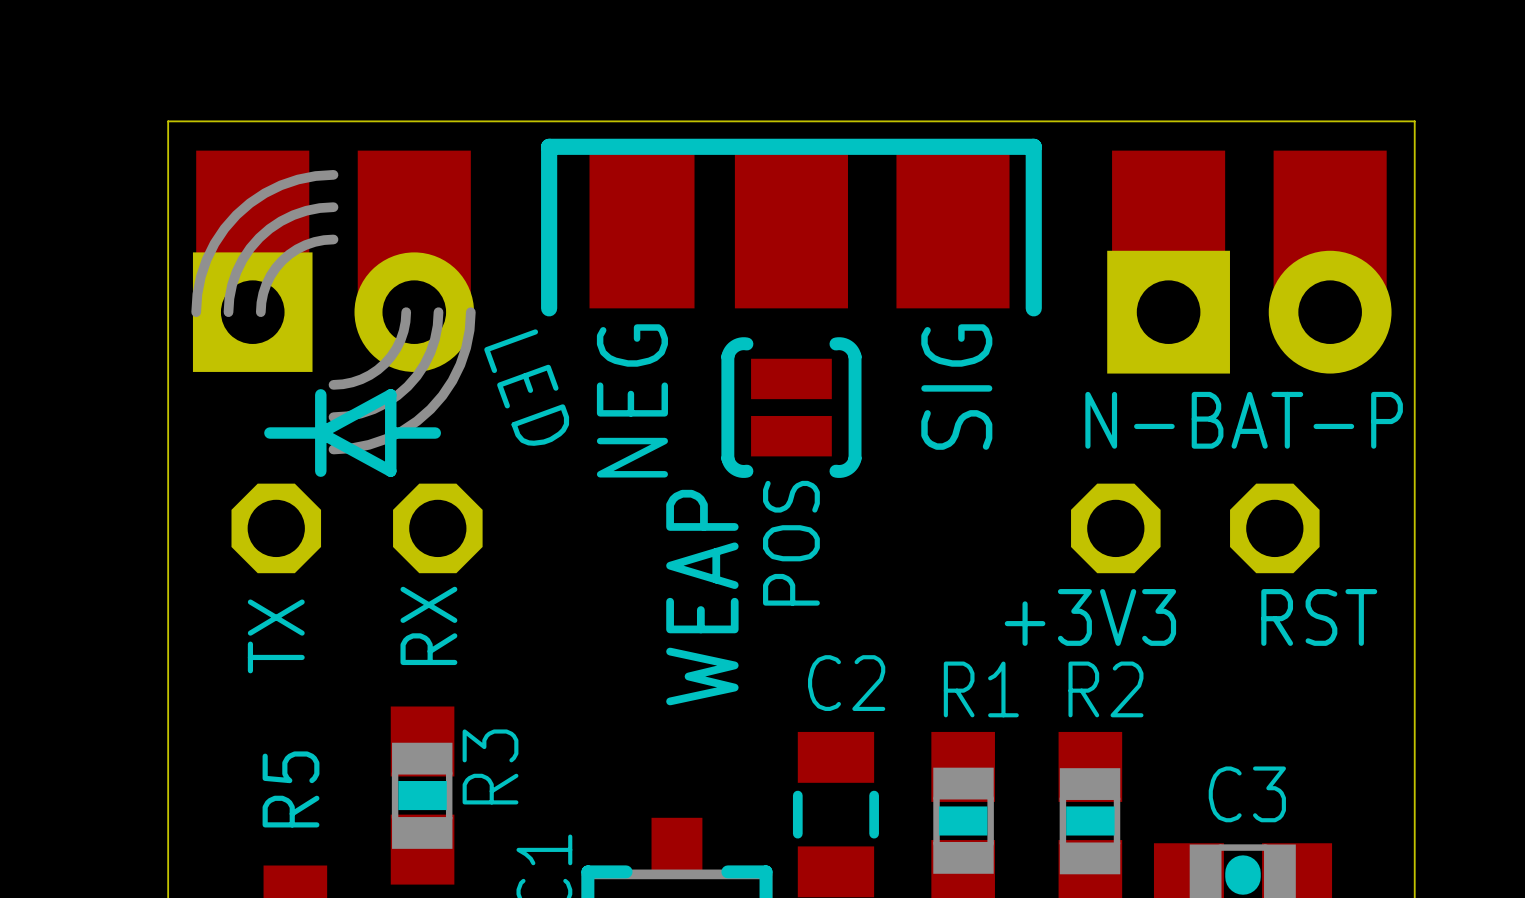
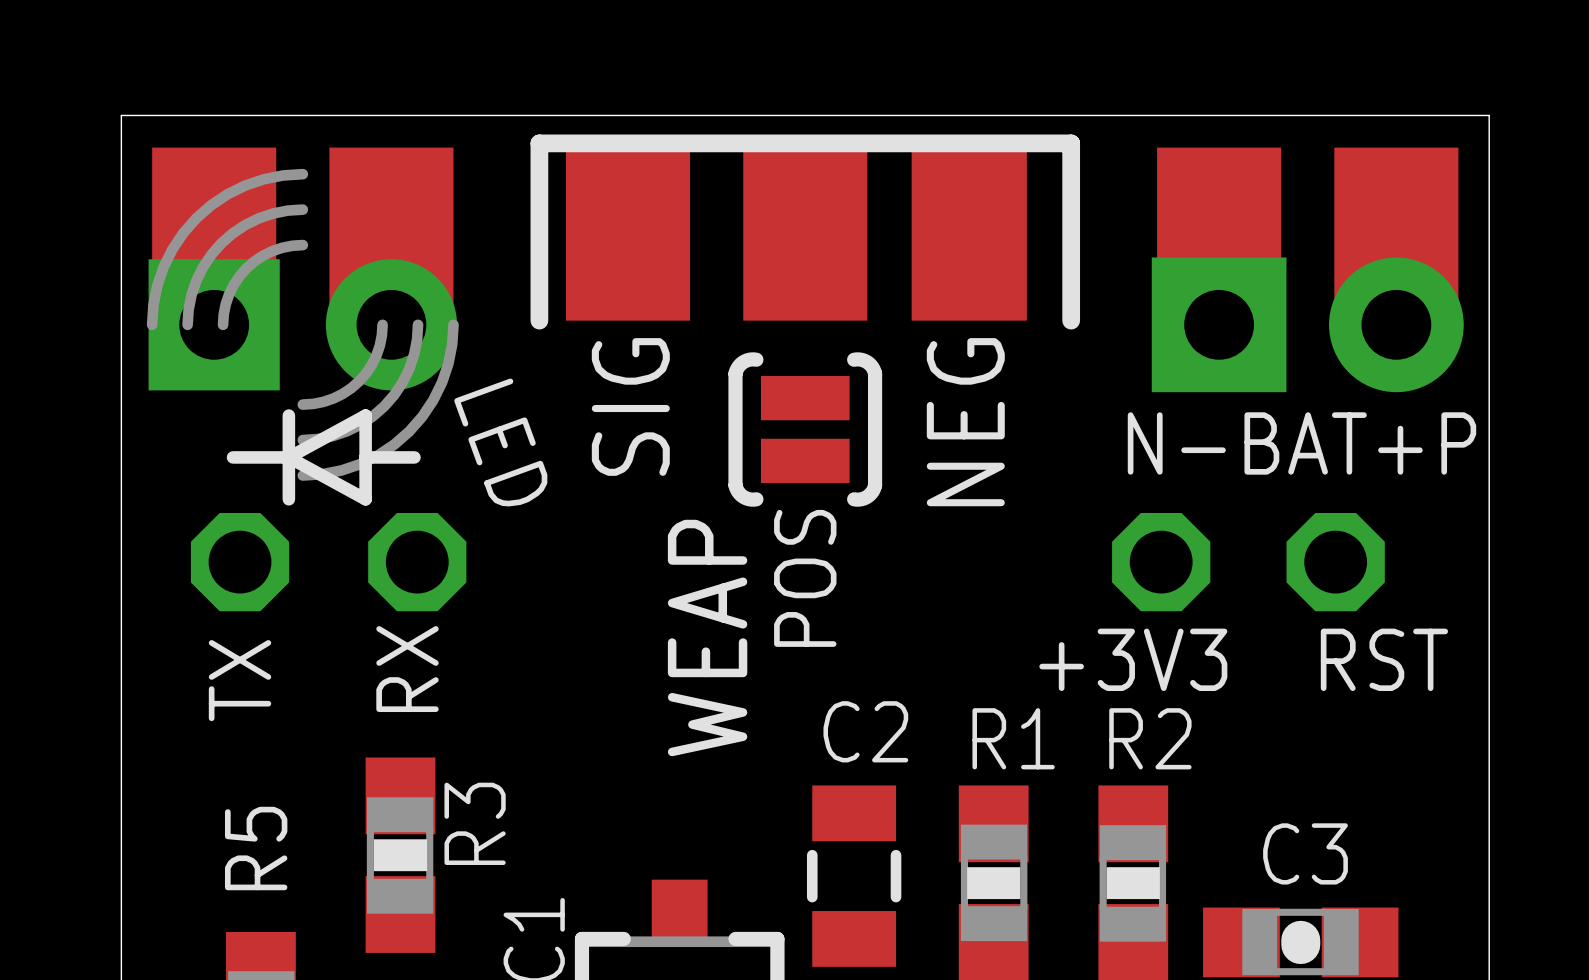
part footprint: [541, 138, 1042, 317] -> [530, 134, 1081, 330]
LED name position: LED (526, 387) -> LED (500, 442)
text: SIG (956, 387) -> NEG (965, 422)
text: NEG (632, 400) -> SIG (630, 406)
text: N-BAT-P (1244, 420) -> N-BAT+P (1301, 443)

